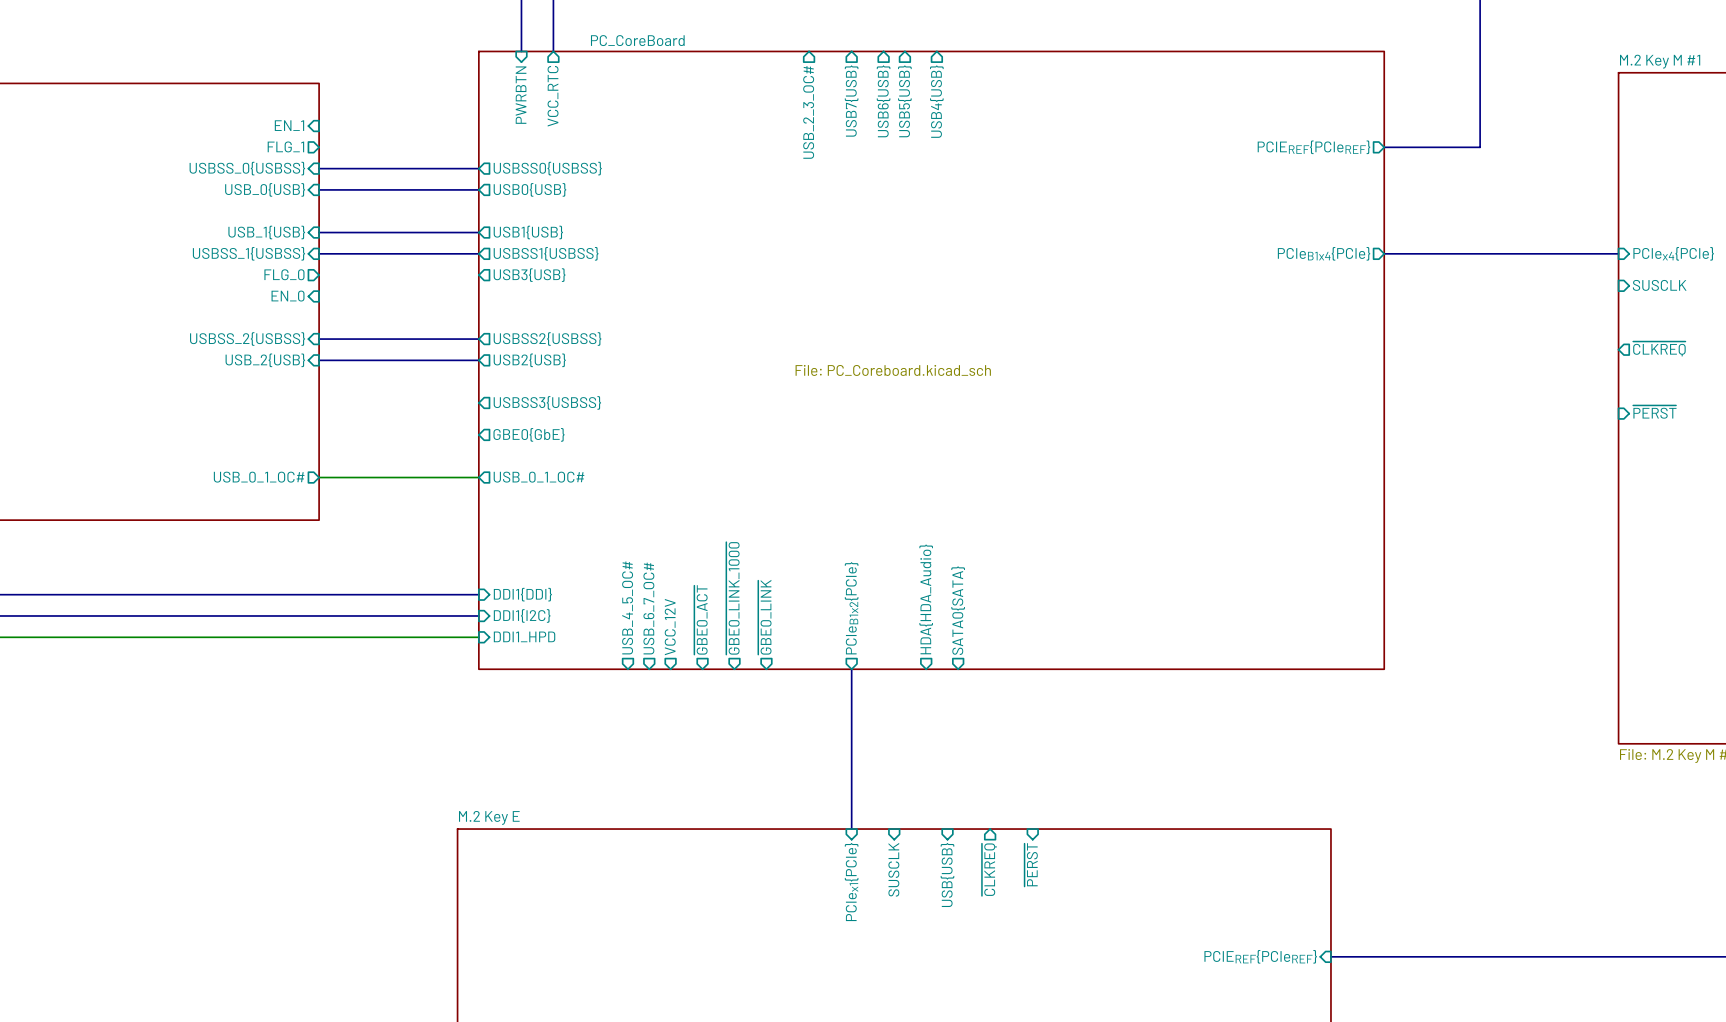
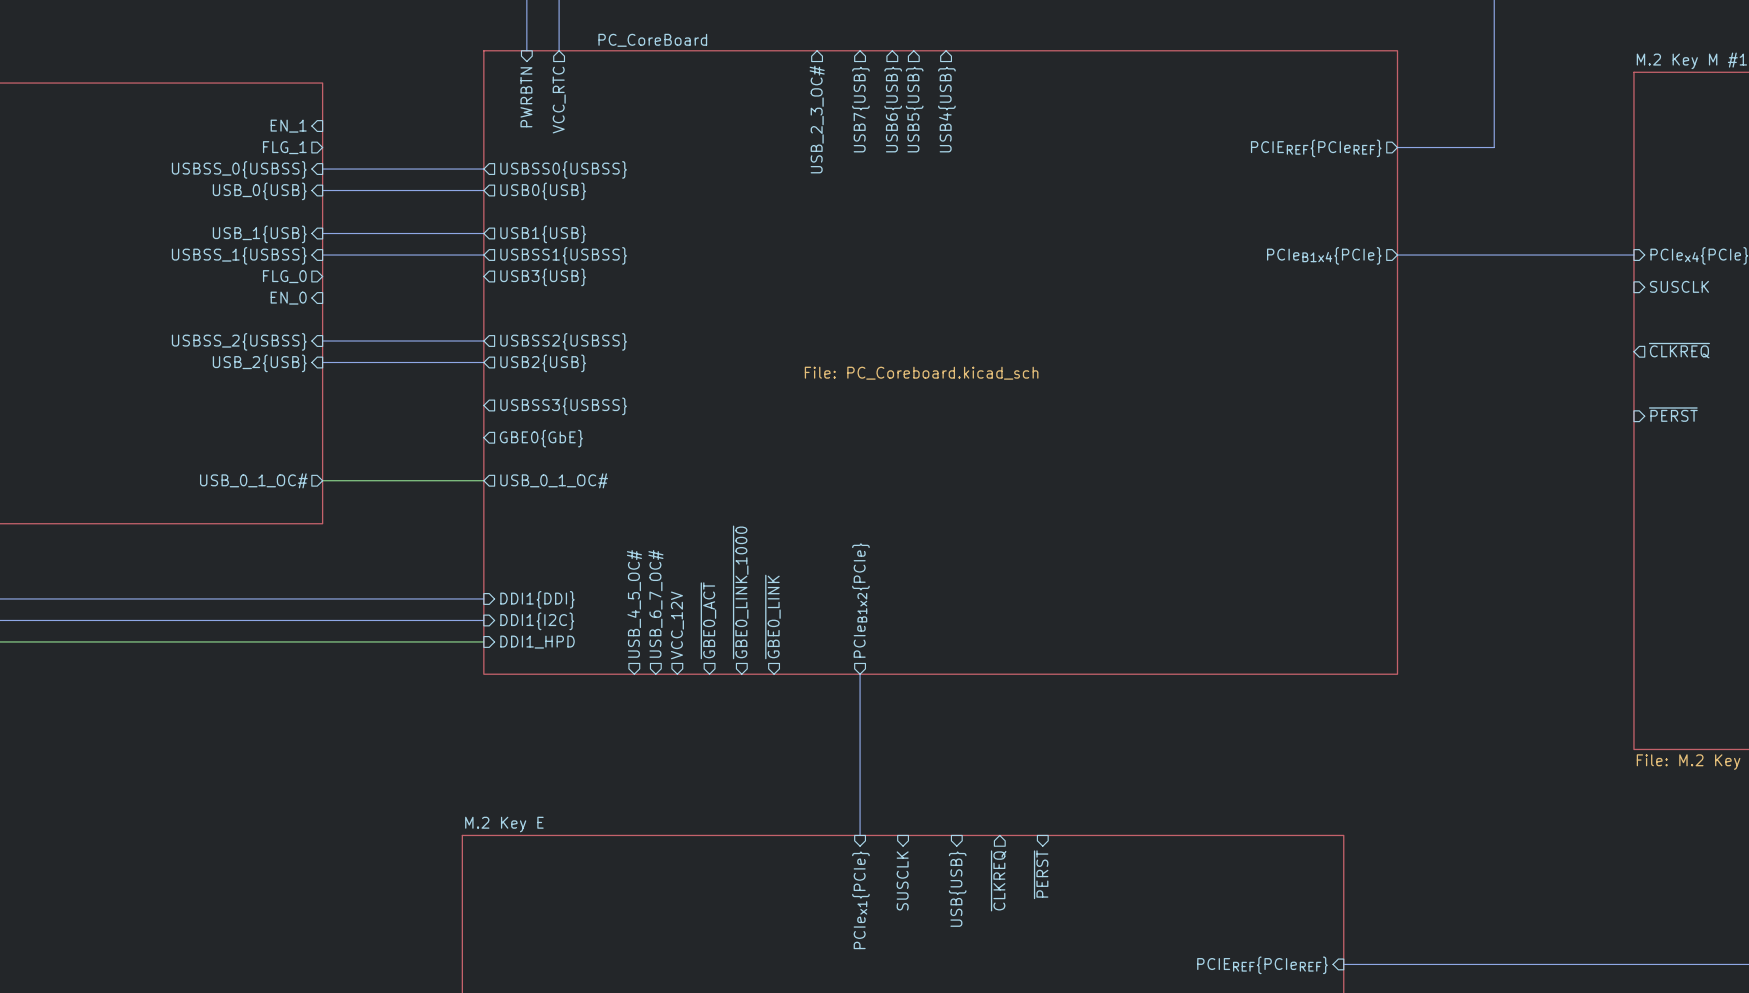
sheet pin: HDA{HDA_Audio} (926, 599) -> none
sheet pin: SATA0{SATA} (958, 610) -> none

